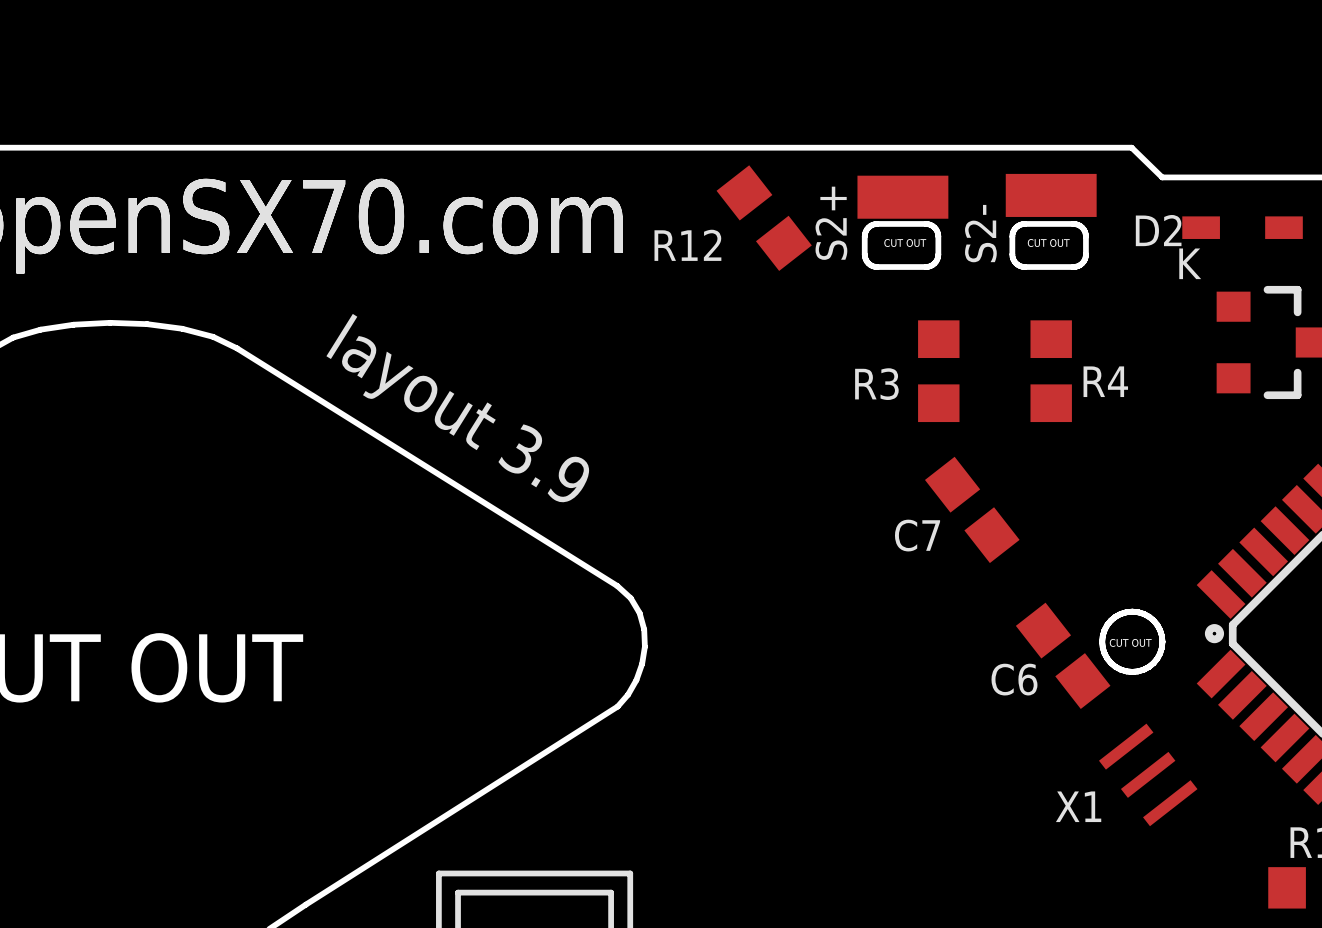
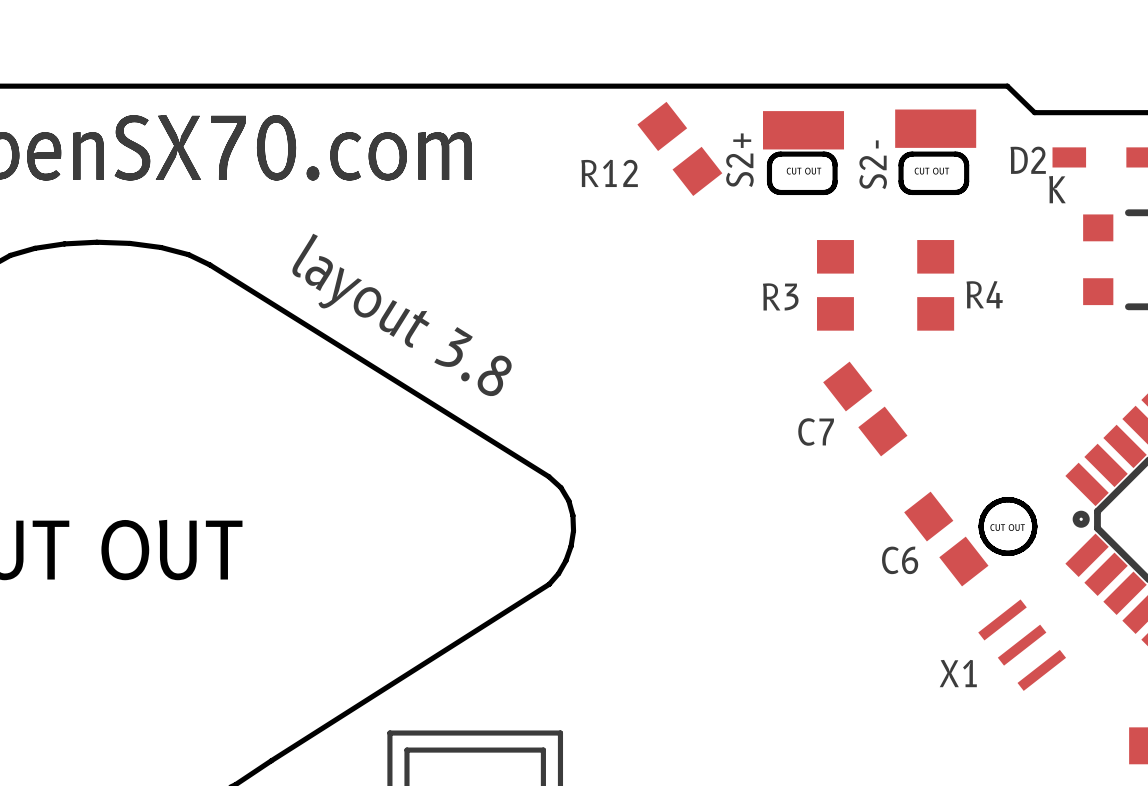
text: layout 3.9 (457, 409) -> layout 3.8 (402, 315)

